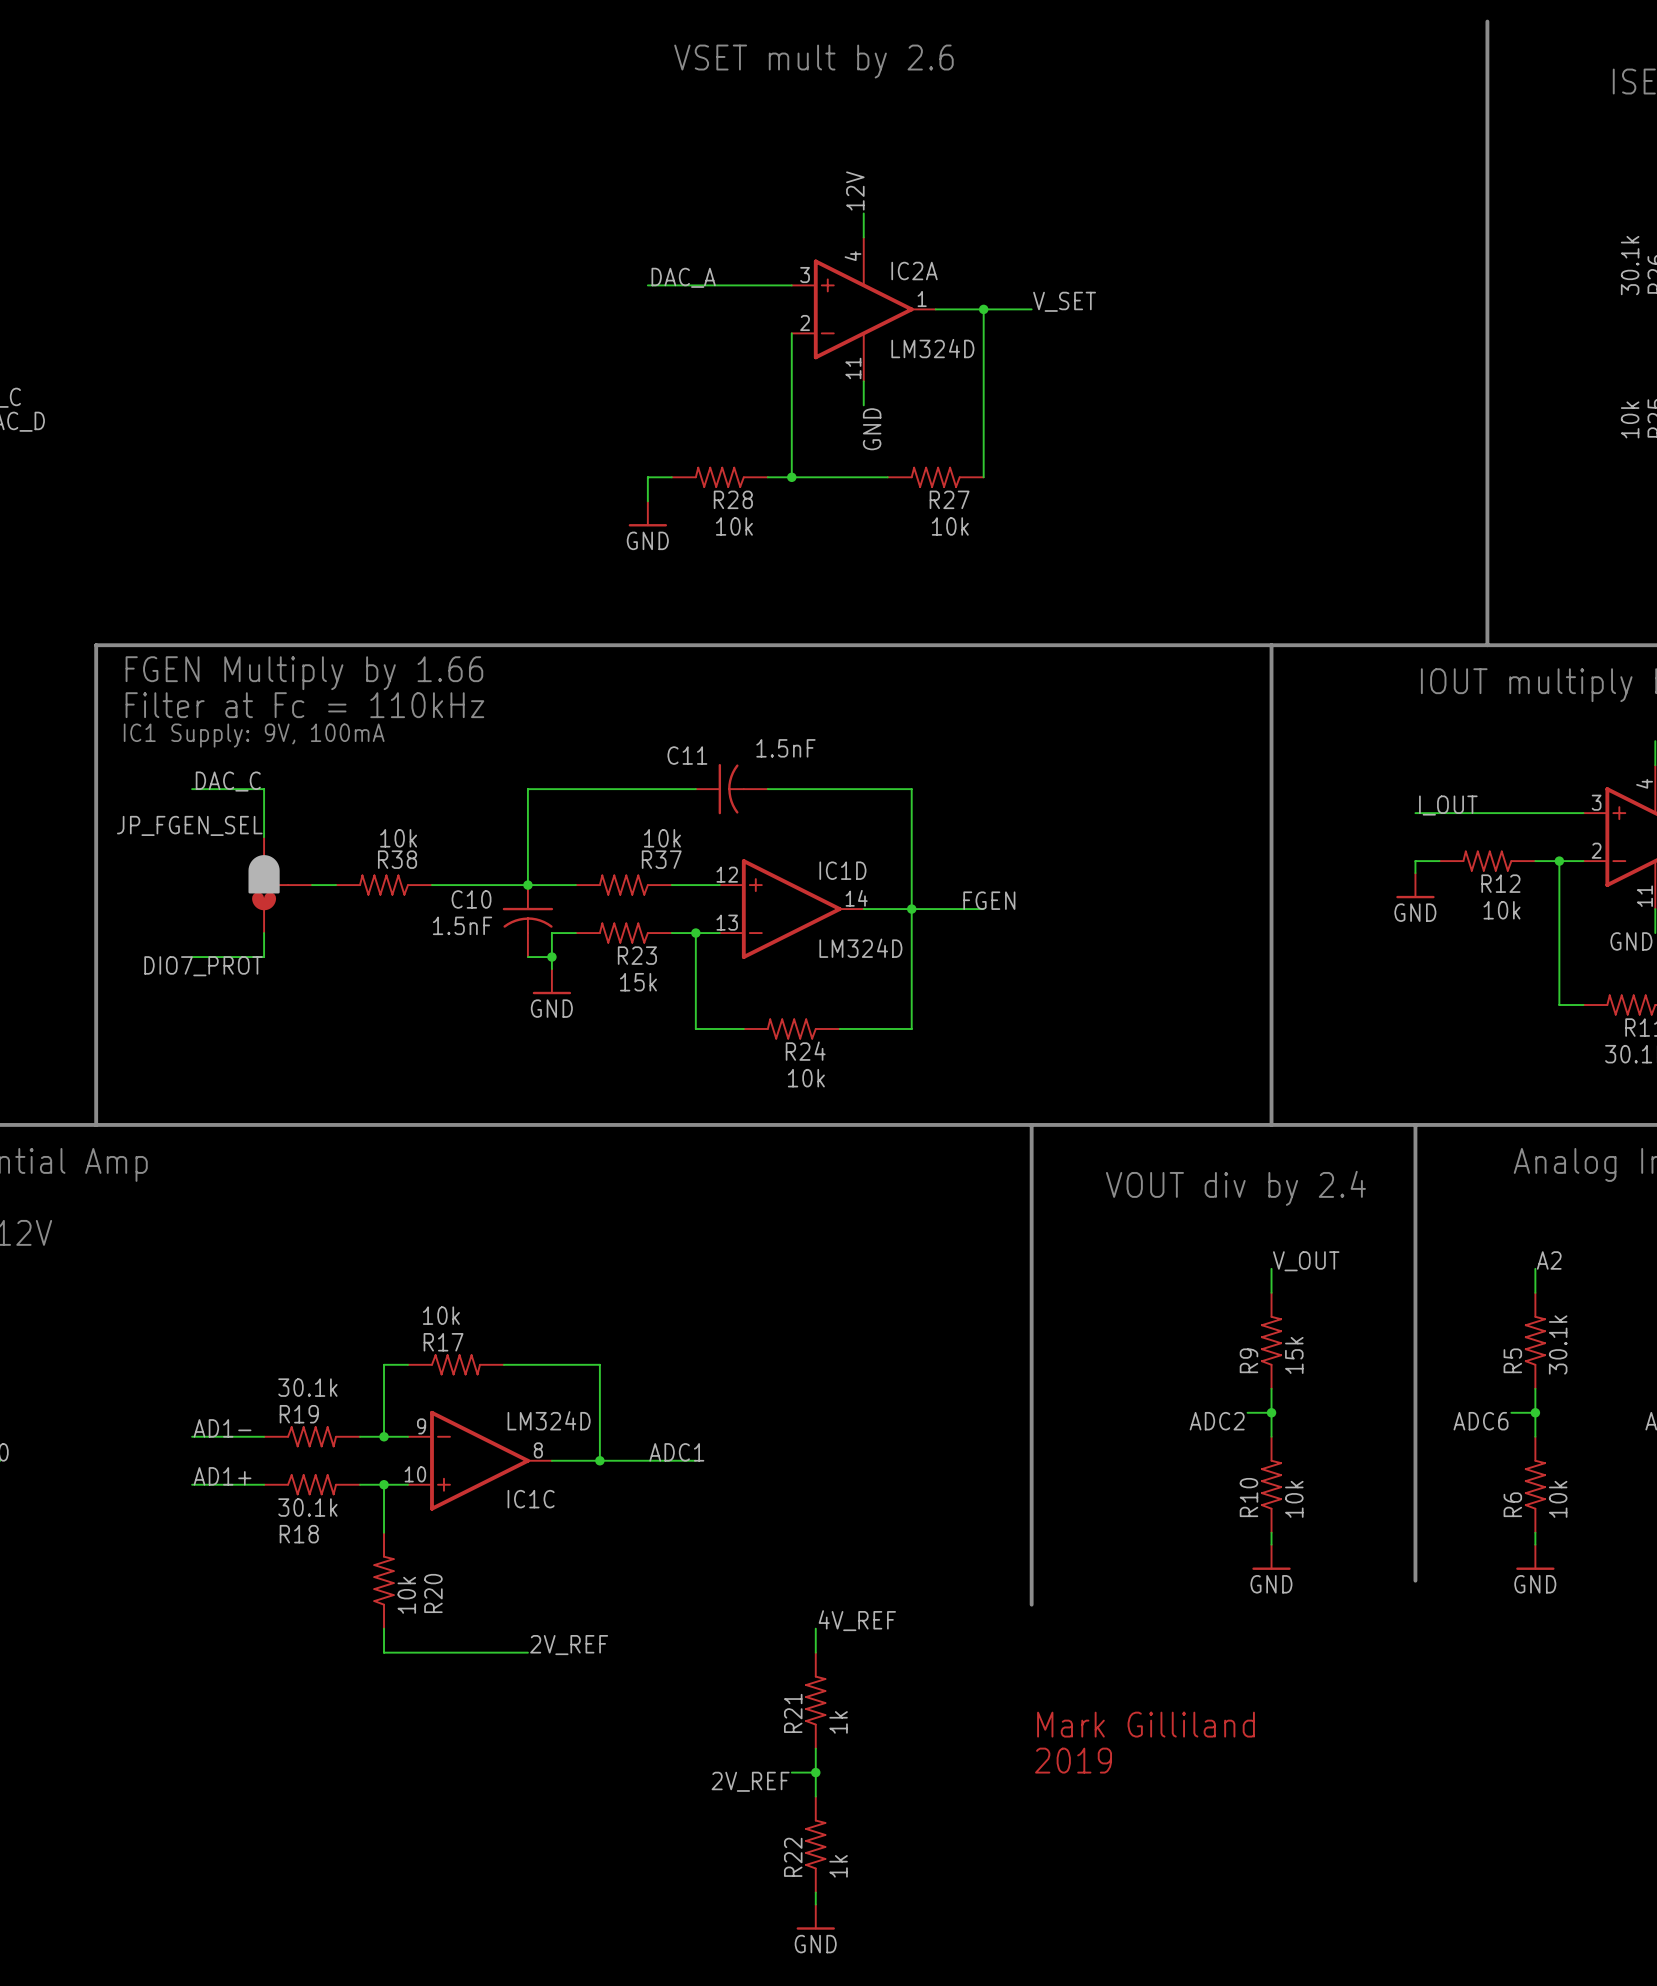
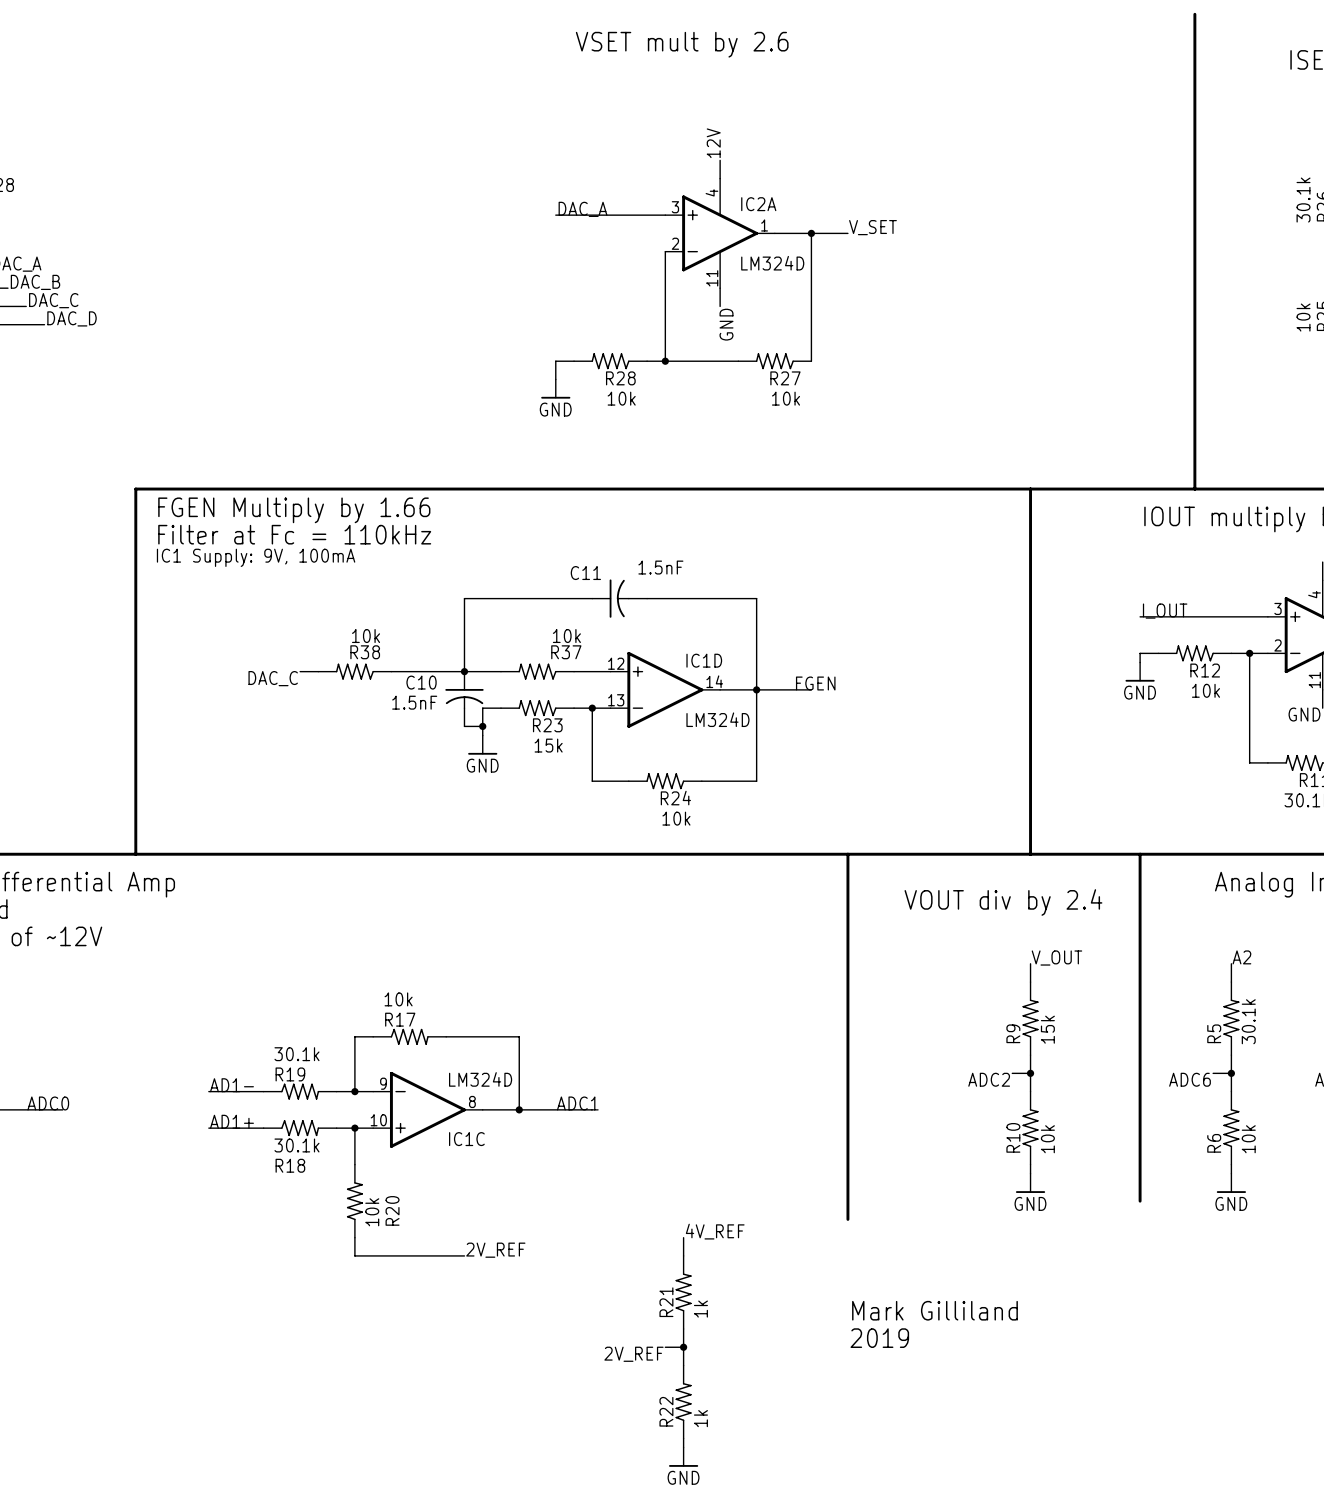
label position: DAC_C (228, 781) -> DAC_C (273, 678)
wire: (192, 789) (264, 789) (264, 837) -> none
JP_FGEN_SEL: (280, 885) -> none
wire: (264, 933) (264, 957) (192, 957) -> none
label: DIO7_PROT (203, 966) -> none

